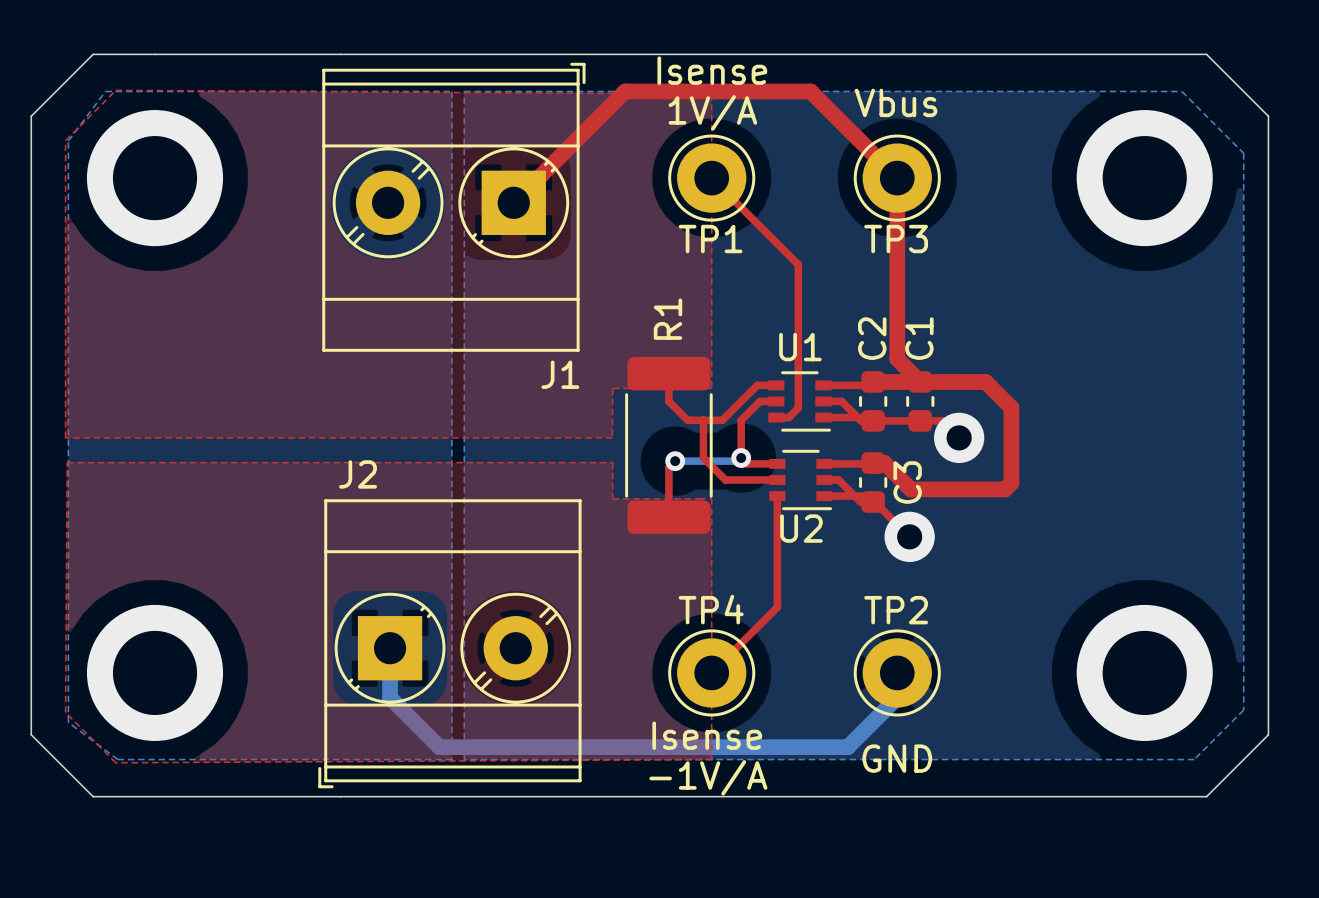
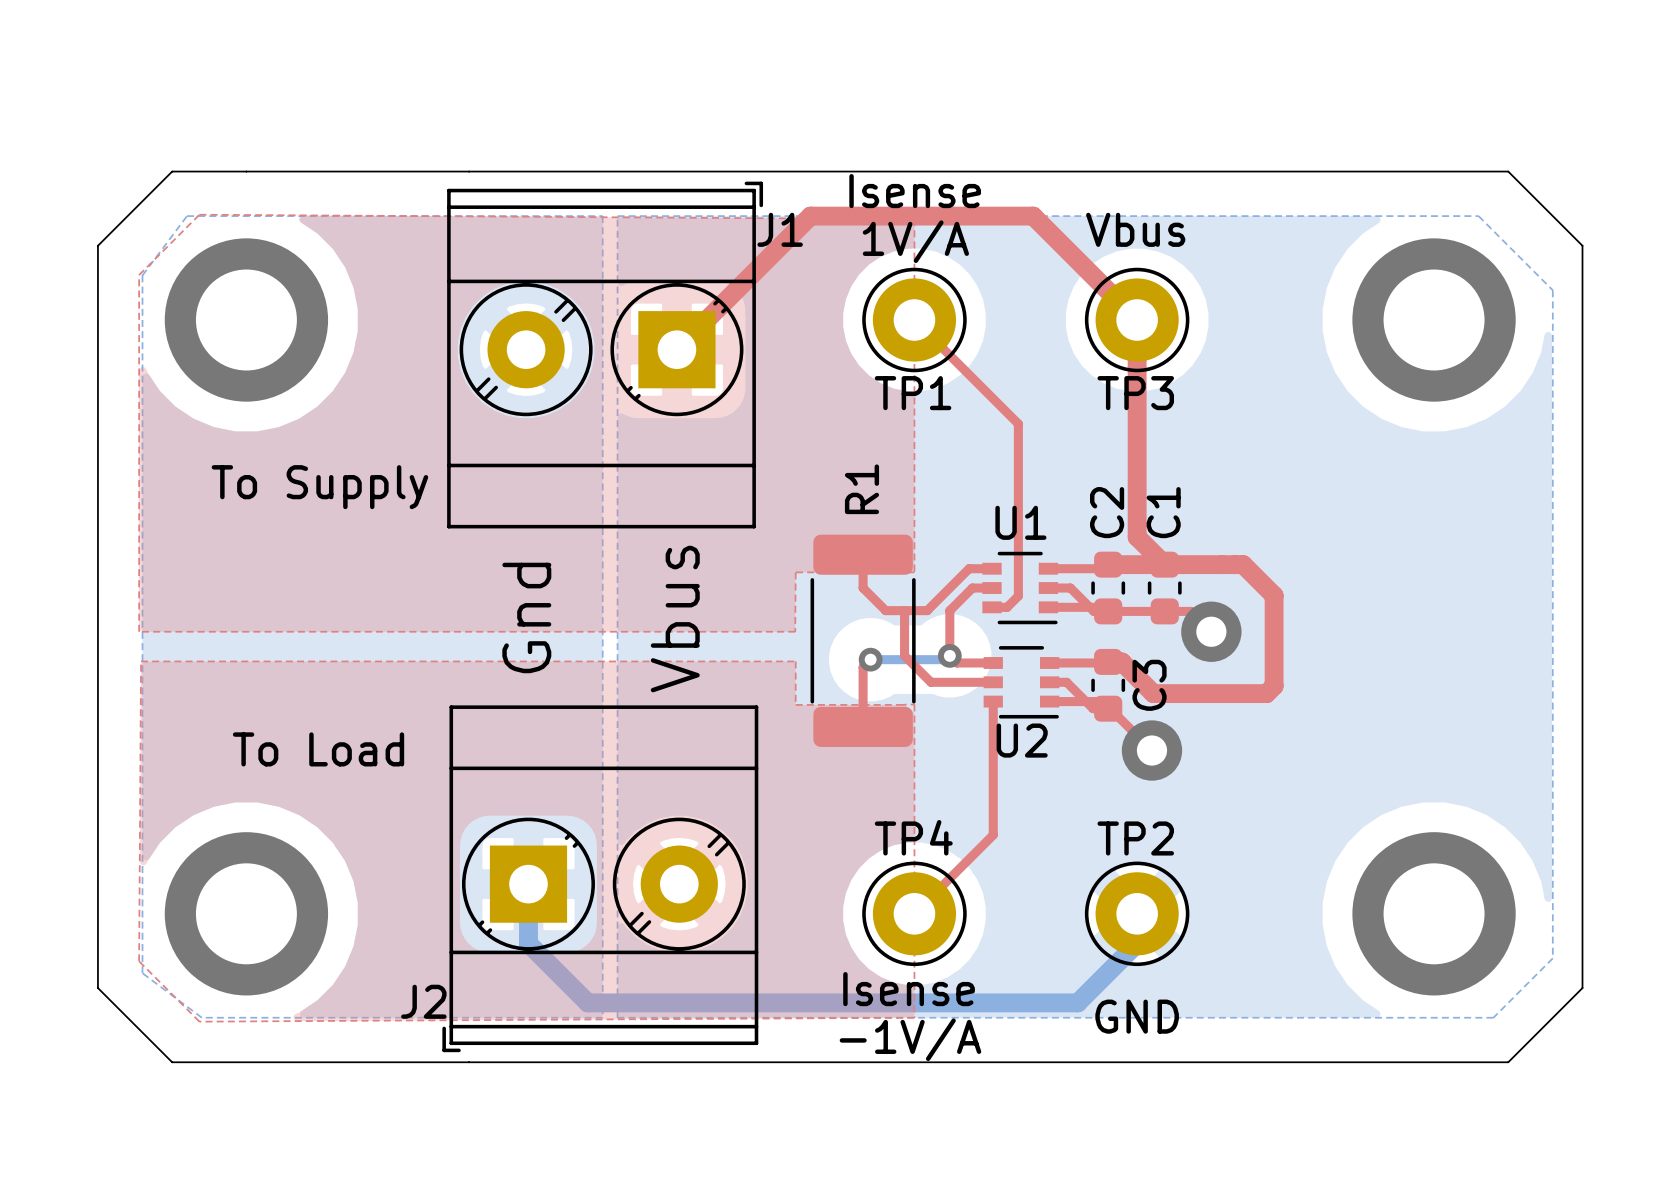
text: none -> To Supply (319, 487)
J1 name position: J1 (560, 374) -> J1 (780, 229)
text: none -> Gnd (526, 617)
text: none -> Vbus (675, 619)
J2 name position: J2 (358, 474) -> J2 (423, 1001)
text: none -> To Load (318, 749)

